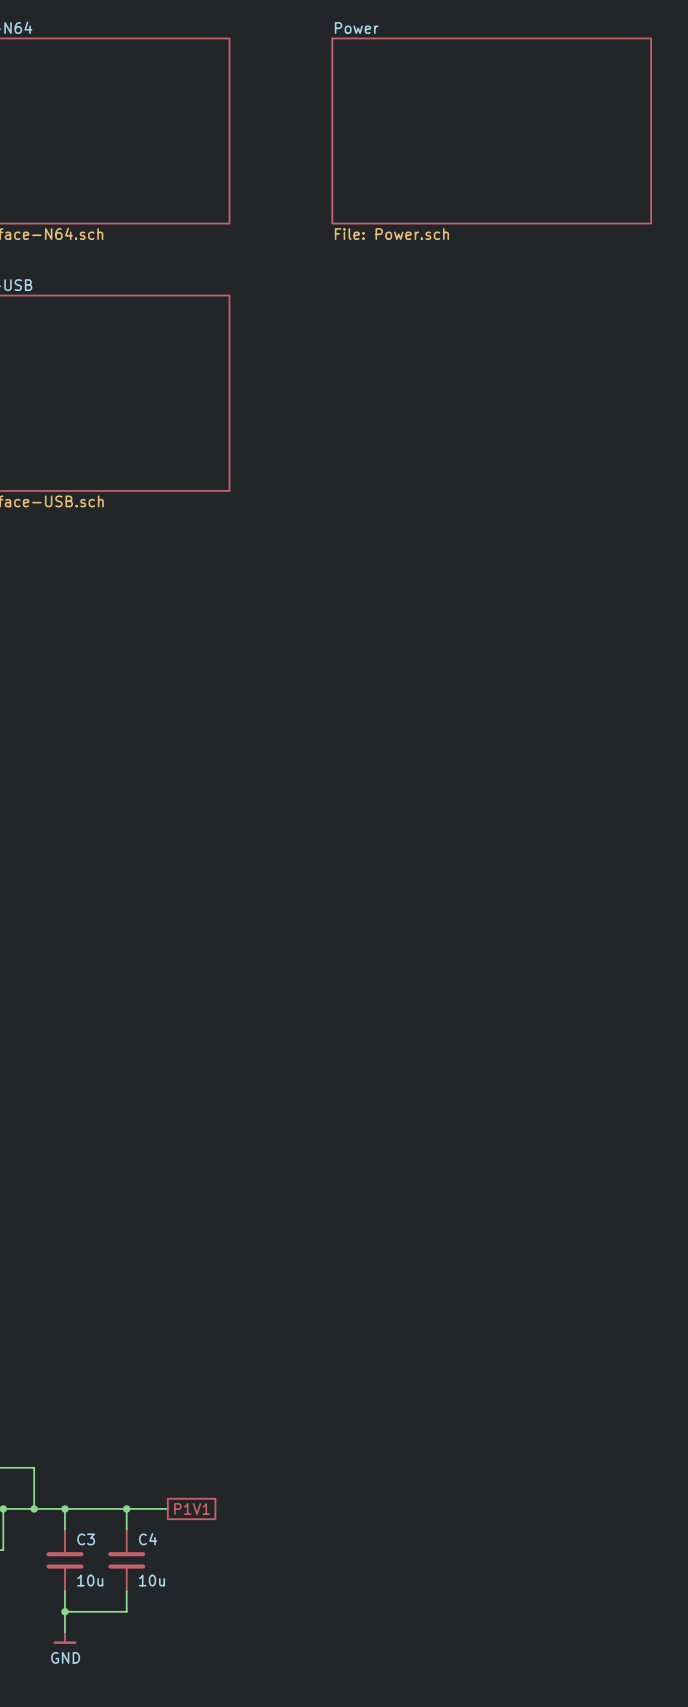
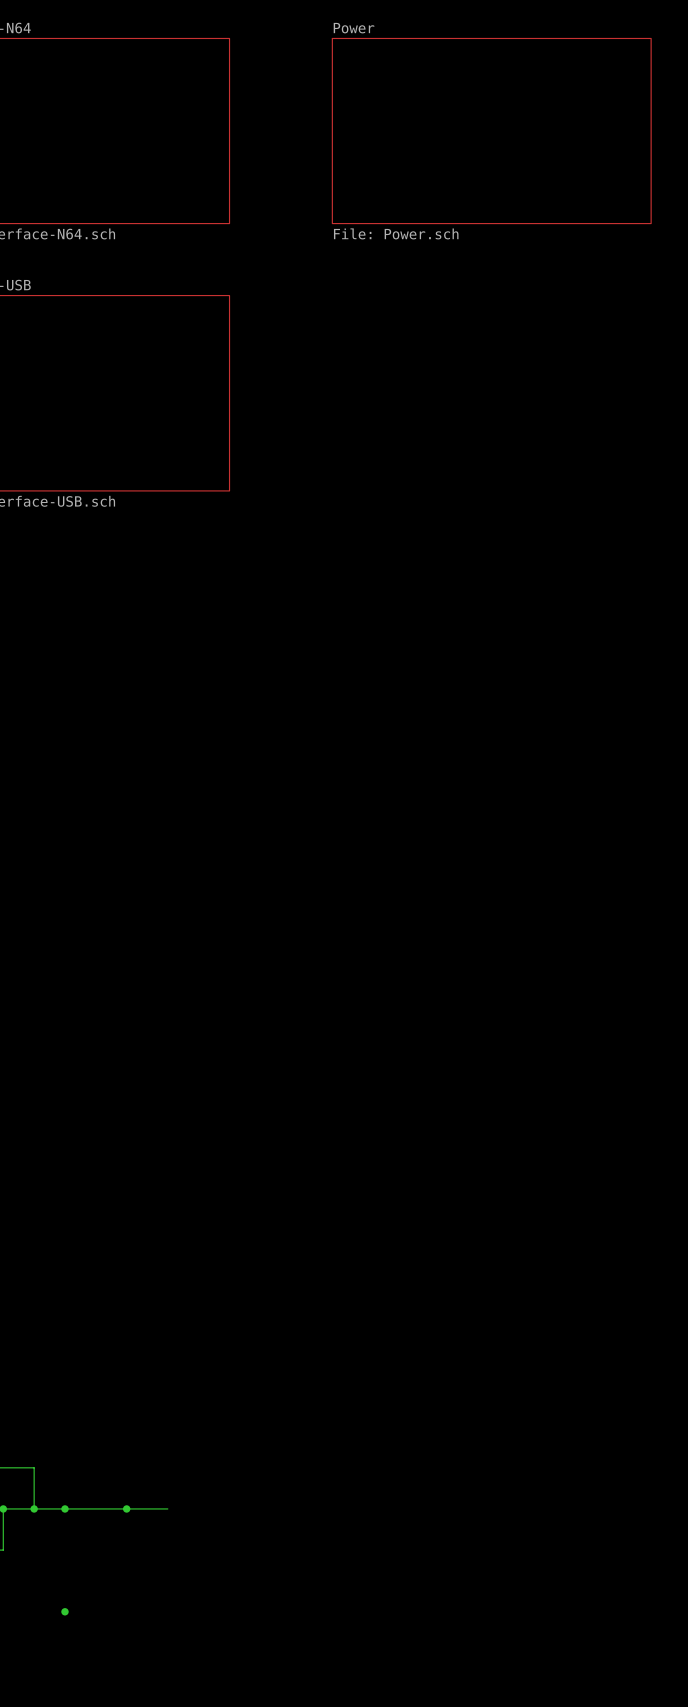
wire: (64, 1508) (64, 1529) -> none
wire: (126, 1508) (126, 1529) -> none
global label: P1V1 (192, 1508) -> none
C3: 10u (64, 1560) -> none
C4: 10u (126, 1560) -> none
wire: (64, 1591) (64, 1632) -> none
wire: (126, 1591) (126, 1611) (64, 1611) -> none
power symbol: GND (64, 1638) -> none

